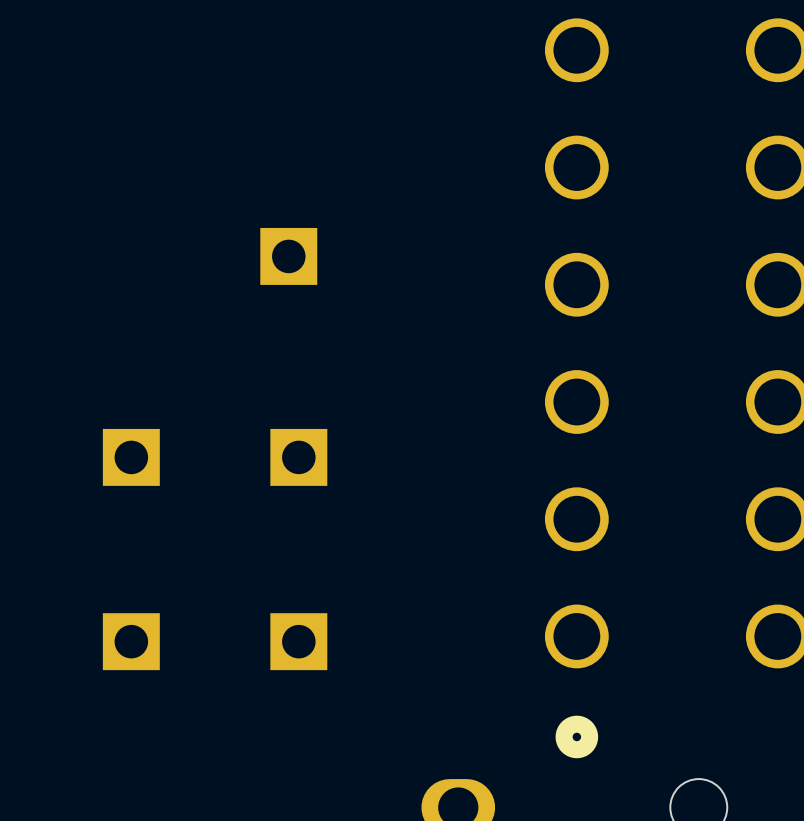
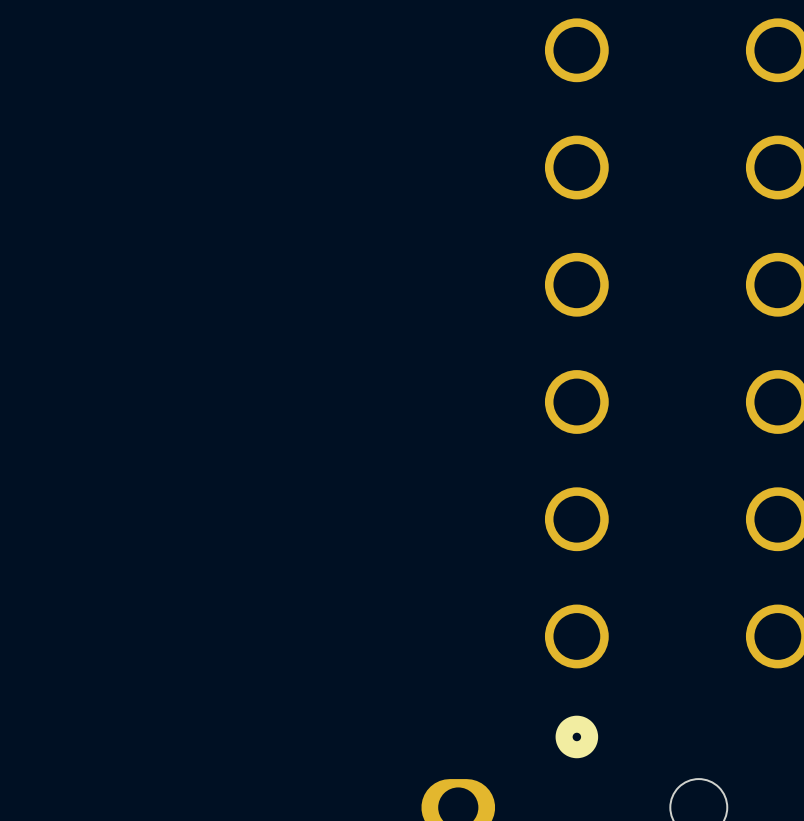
part: (288, 256) -> none
part: (131, 457) -> none
part: (298, 457) -> none
part: (131, 641) -> none
part: (298, 641) -> none

